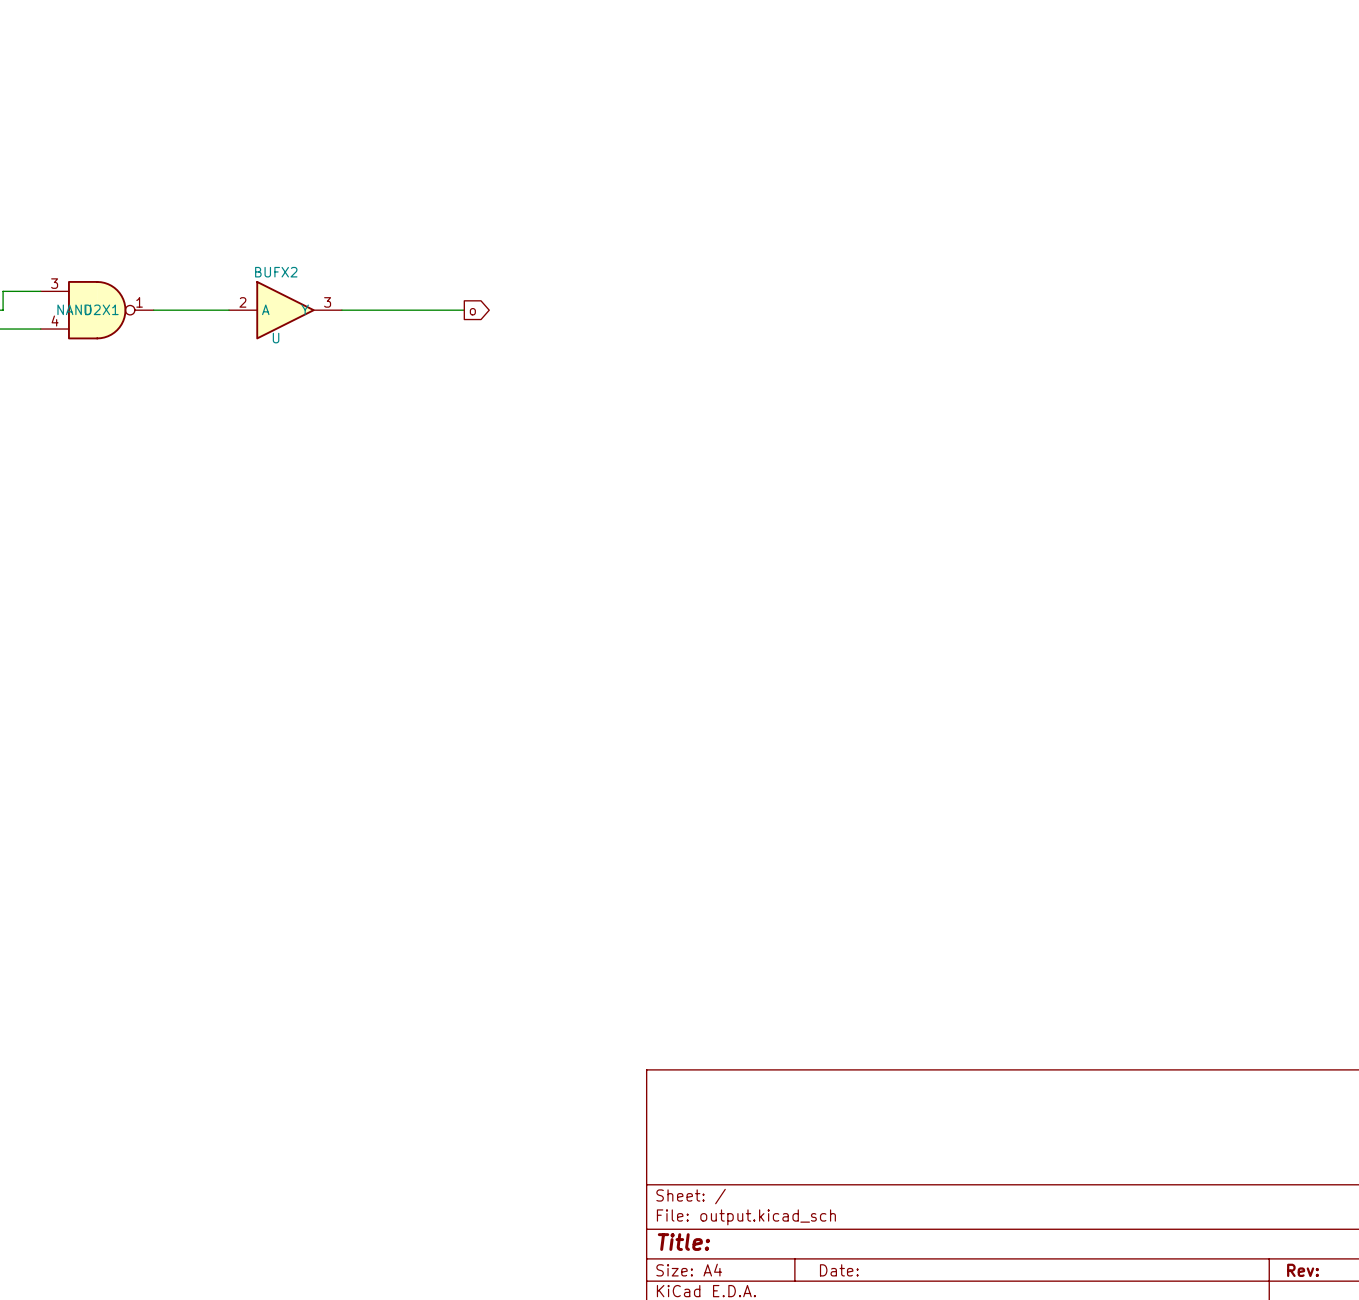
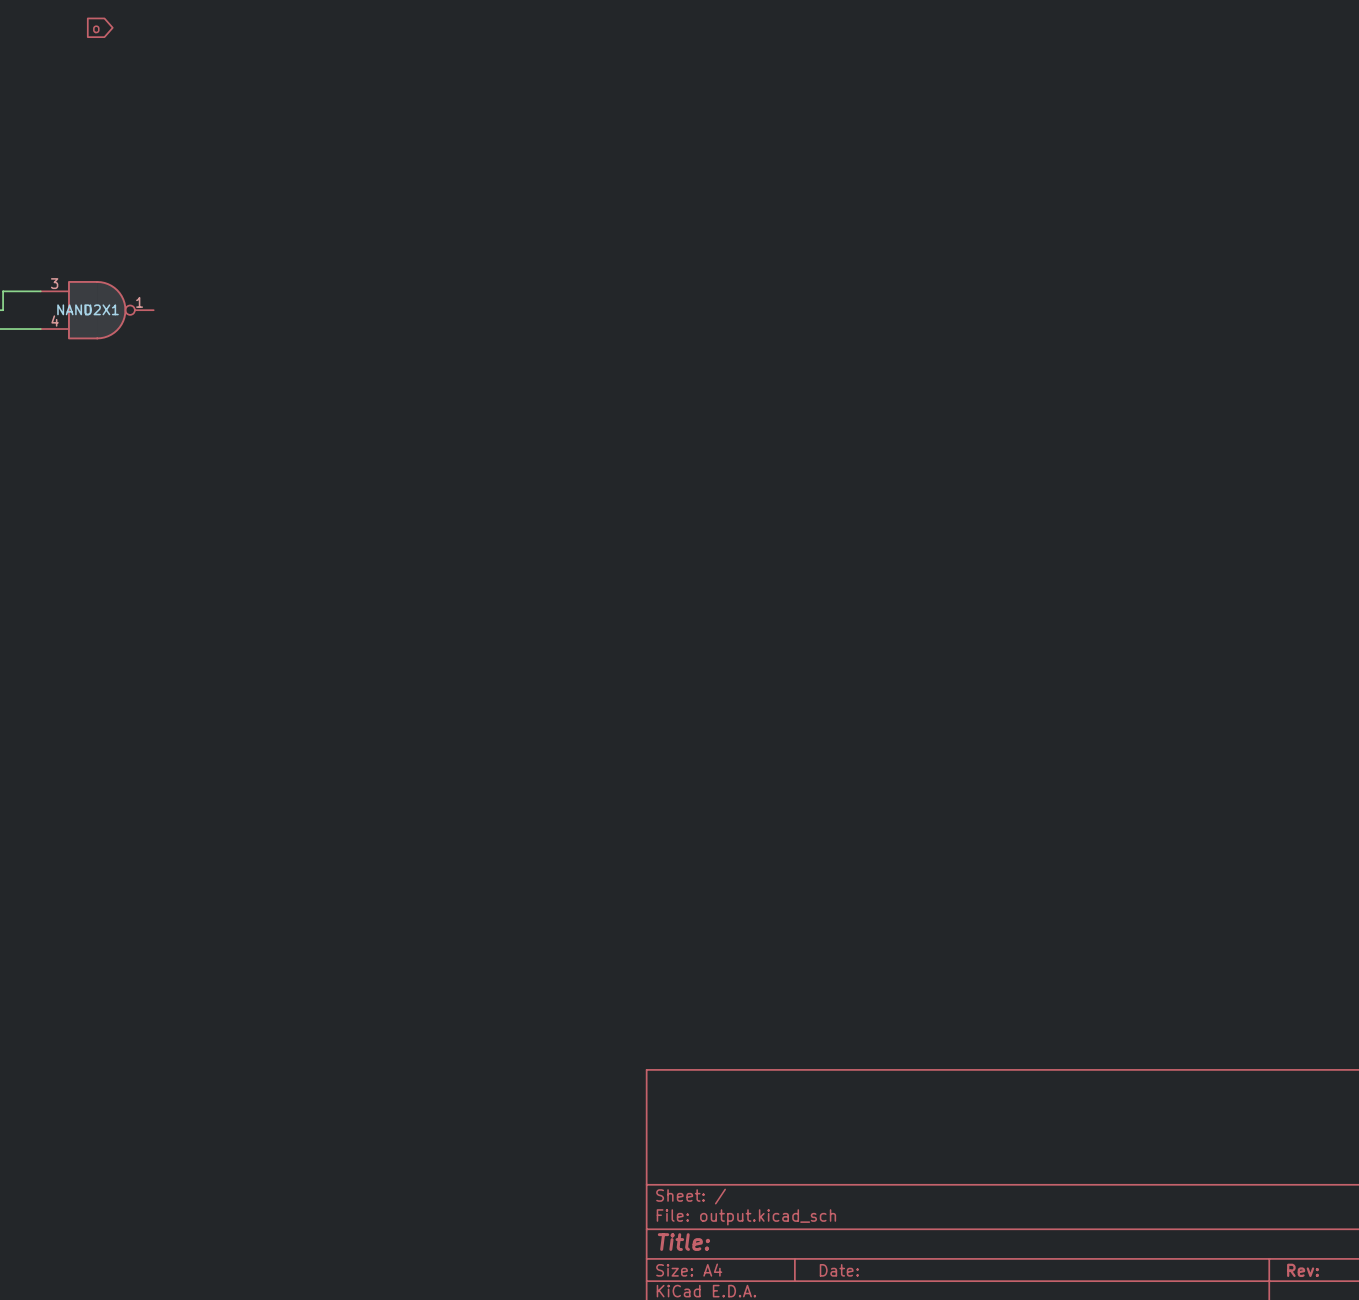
global label: none -> o (96, 29)
wire: (153, 310) (228, 310) -> none
U: BUFX2 (285, 310) -> none
wire: (341, 310) (464, 310) -> none
global label: o (472, 311) -> none

